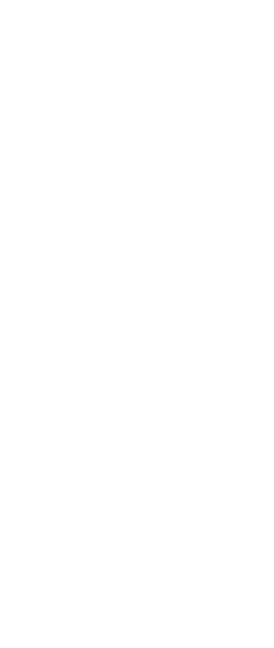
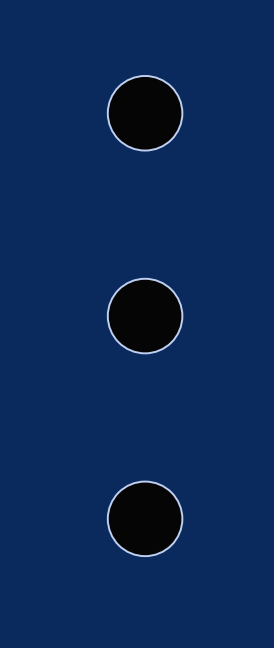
part: none -> (145, 113)
part: none -> (145, 316)
part: none -> (145, 518)

